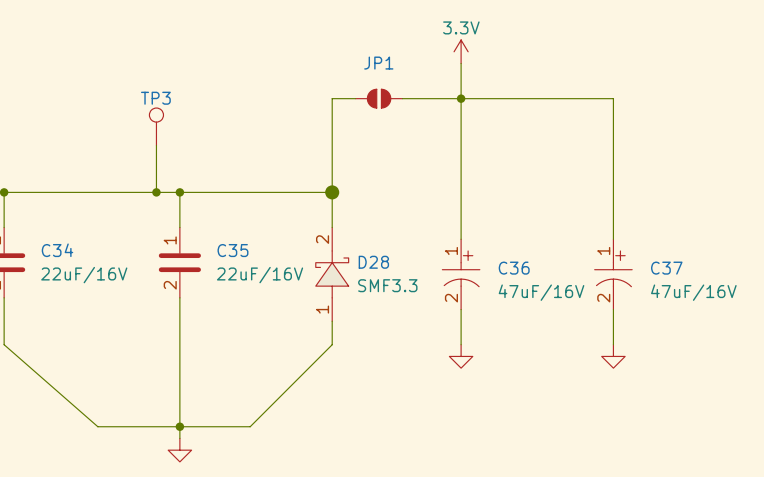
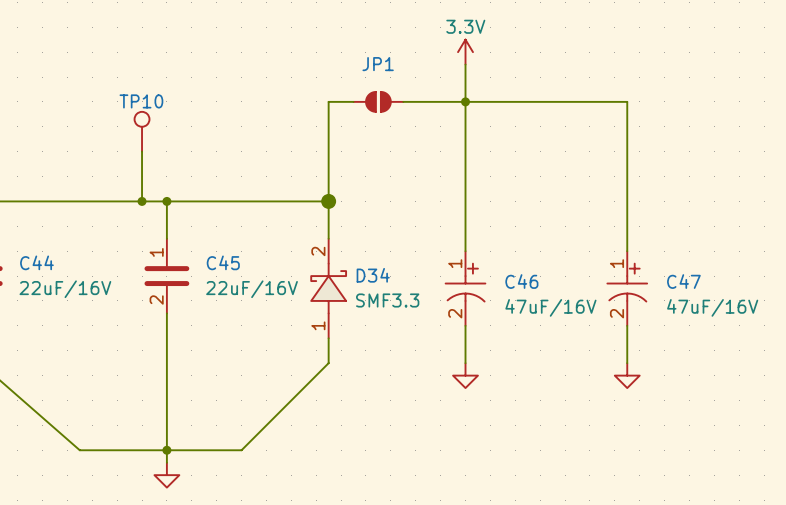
TP3 name: TP3 (155, 98) -> TP10 (141, 101)
C34 name: C34 (57, 250) -> C44 (36, 262)
C35 name: C35 (232, 250) -> C45 (223, 262)
D28 name: D28 (373, 262) -> D34 (373, 275)
C36 name: C36 (514, 268) -> C46 (521, 281)
C37 name: C37 (666, 268) -> C47 (683, 281)

